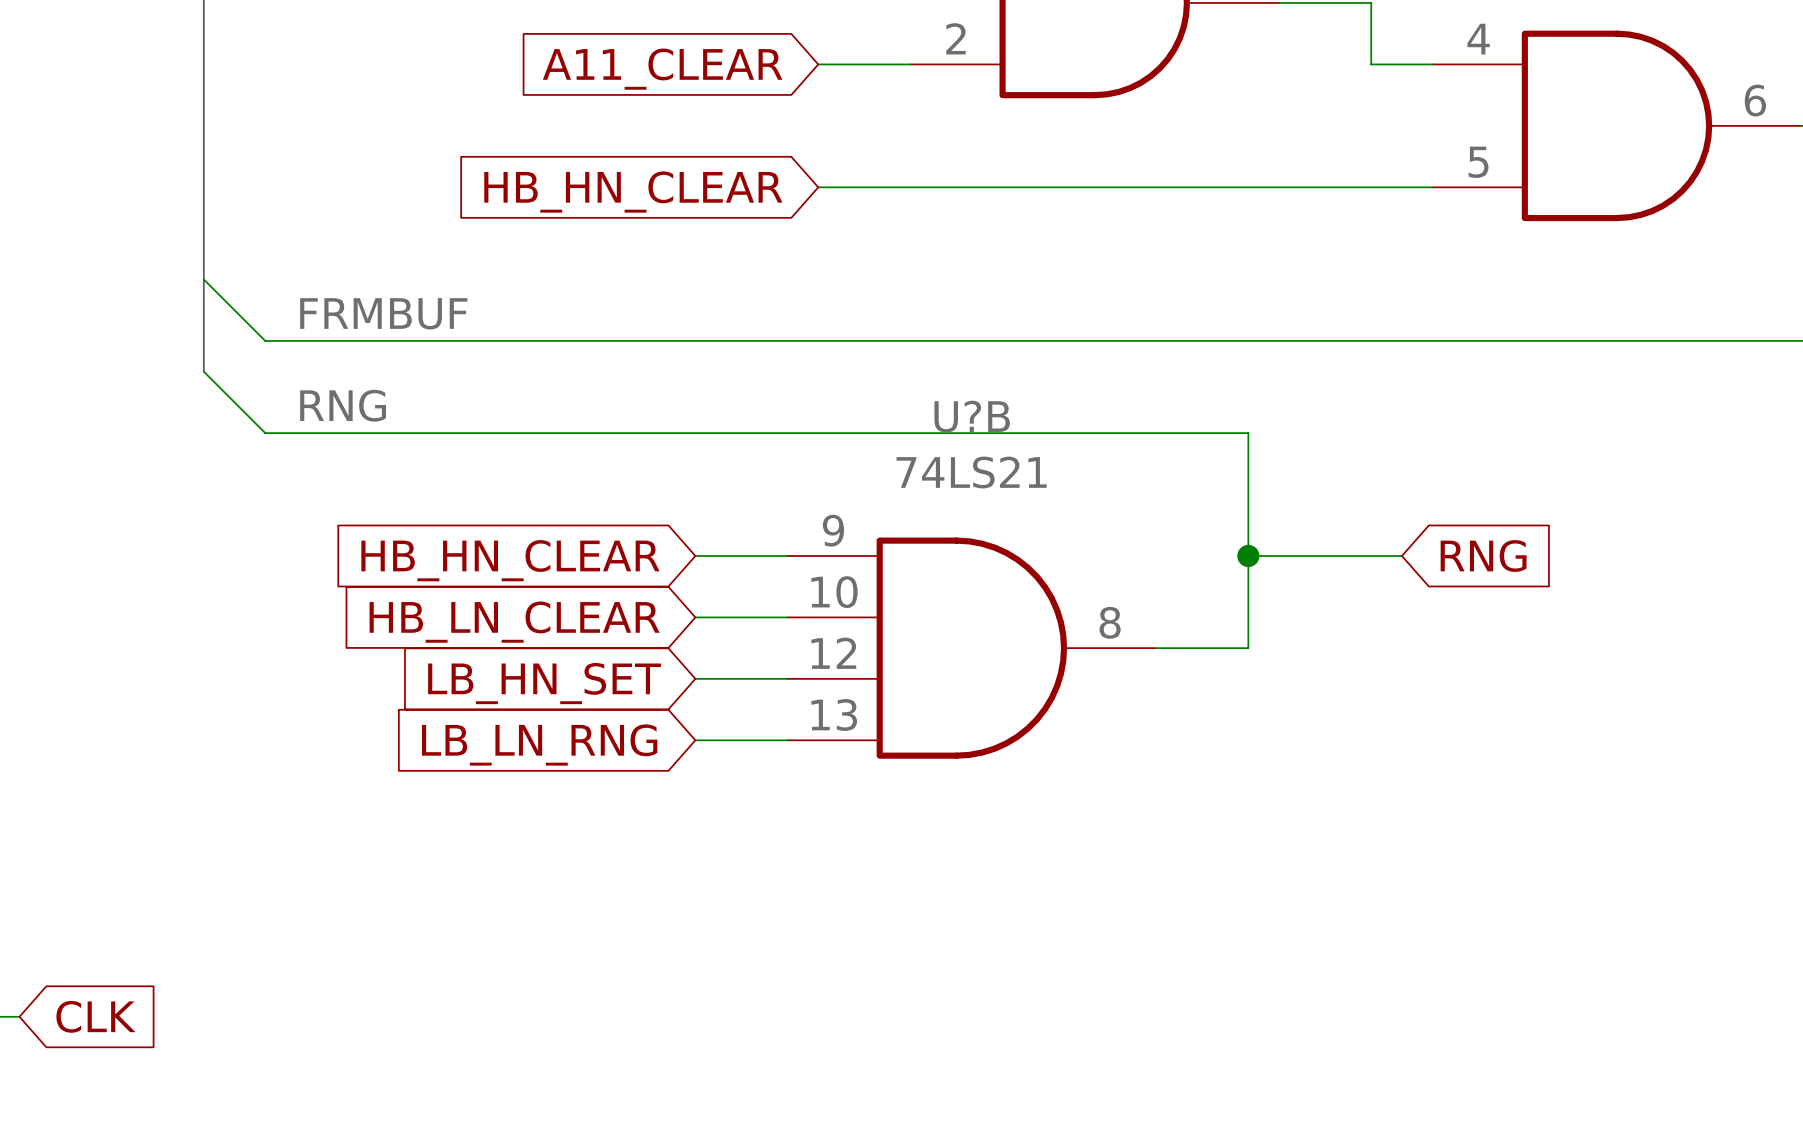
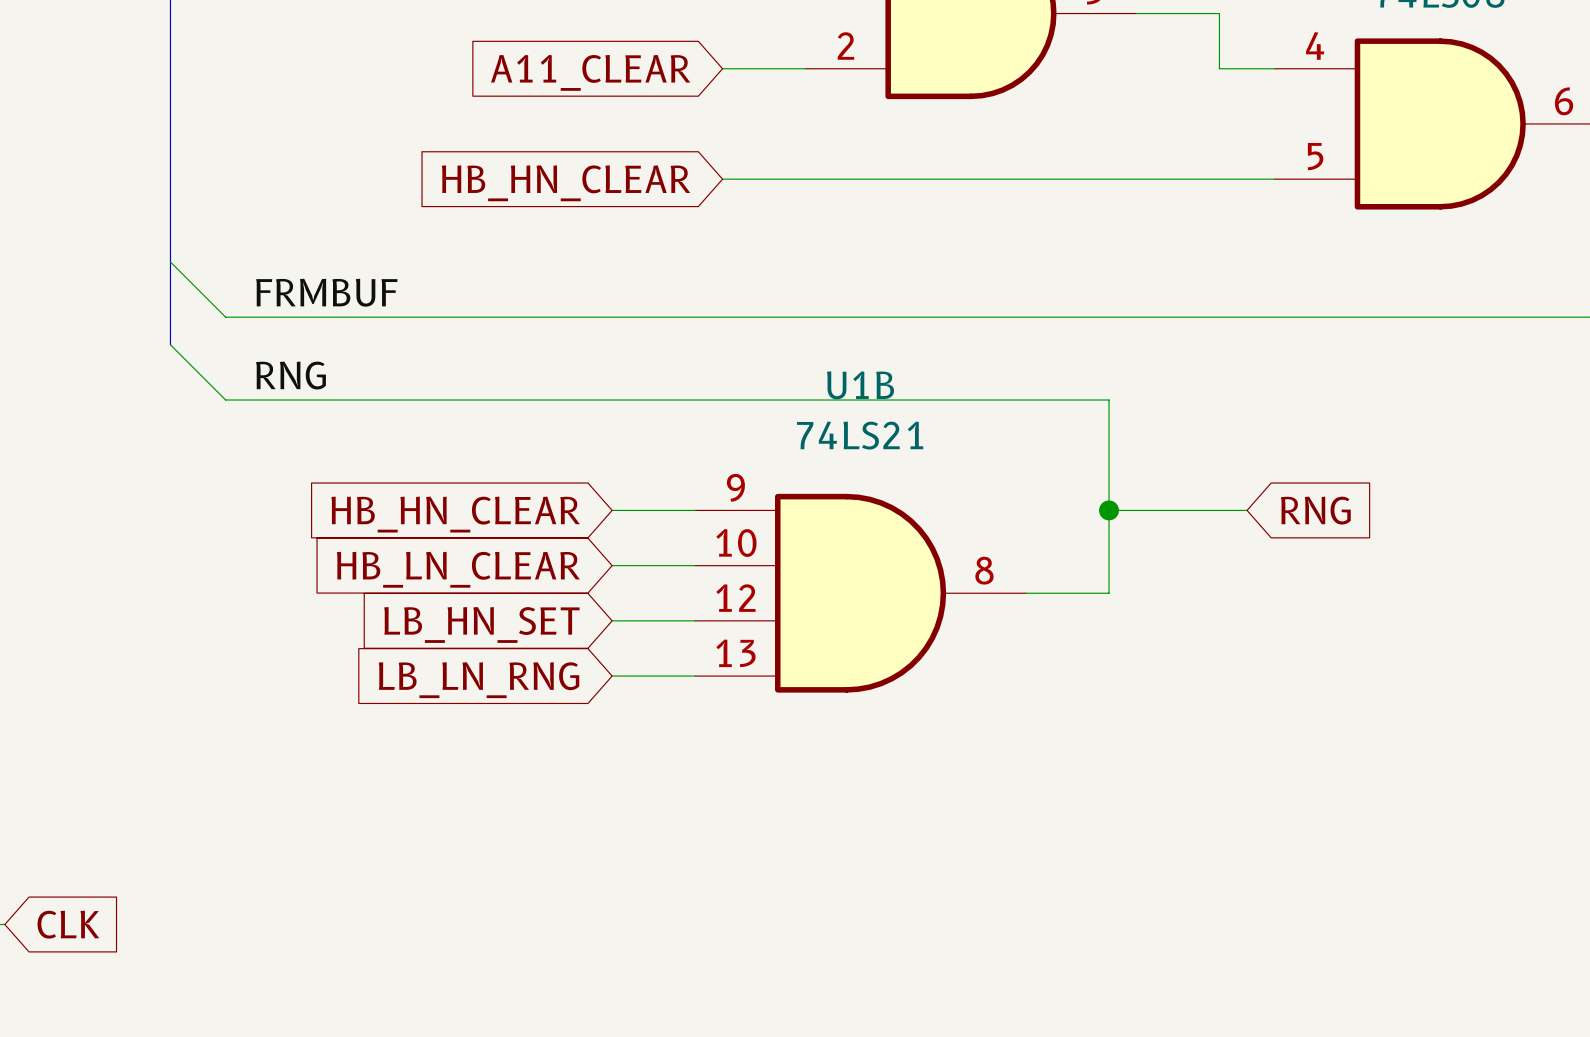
U?B name: U?B (972, 416) -> U1B (860, 385)

